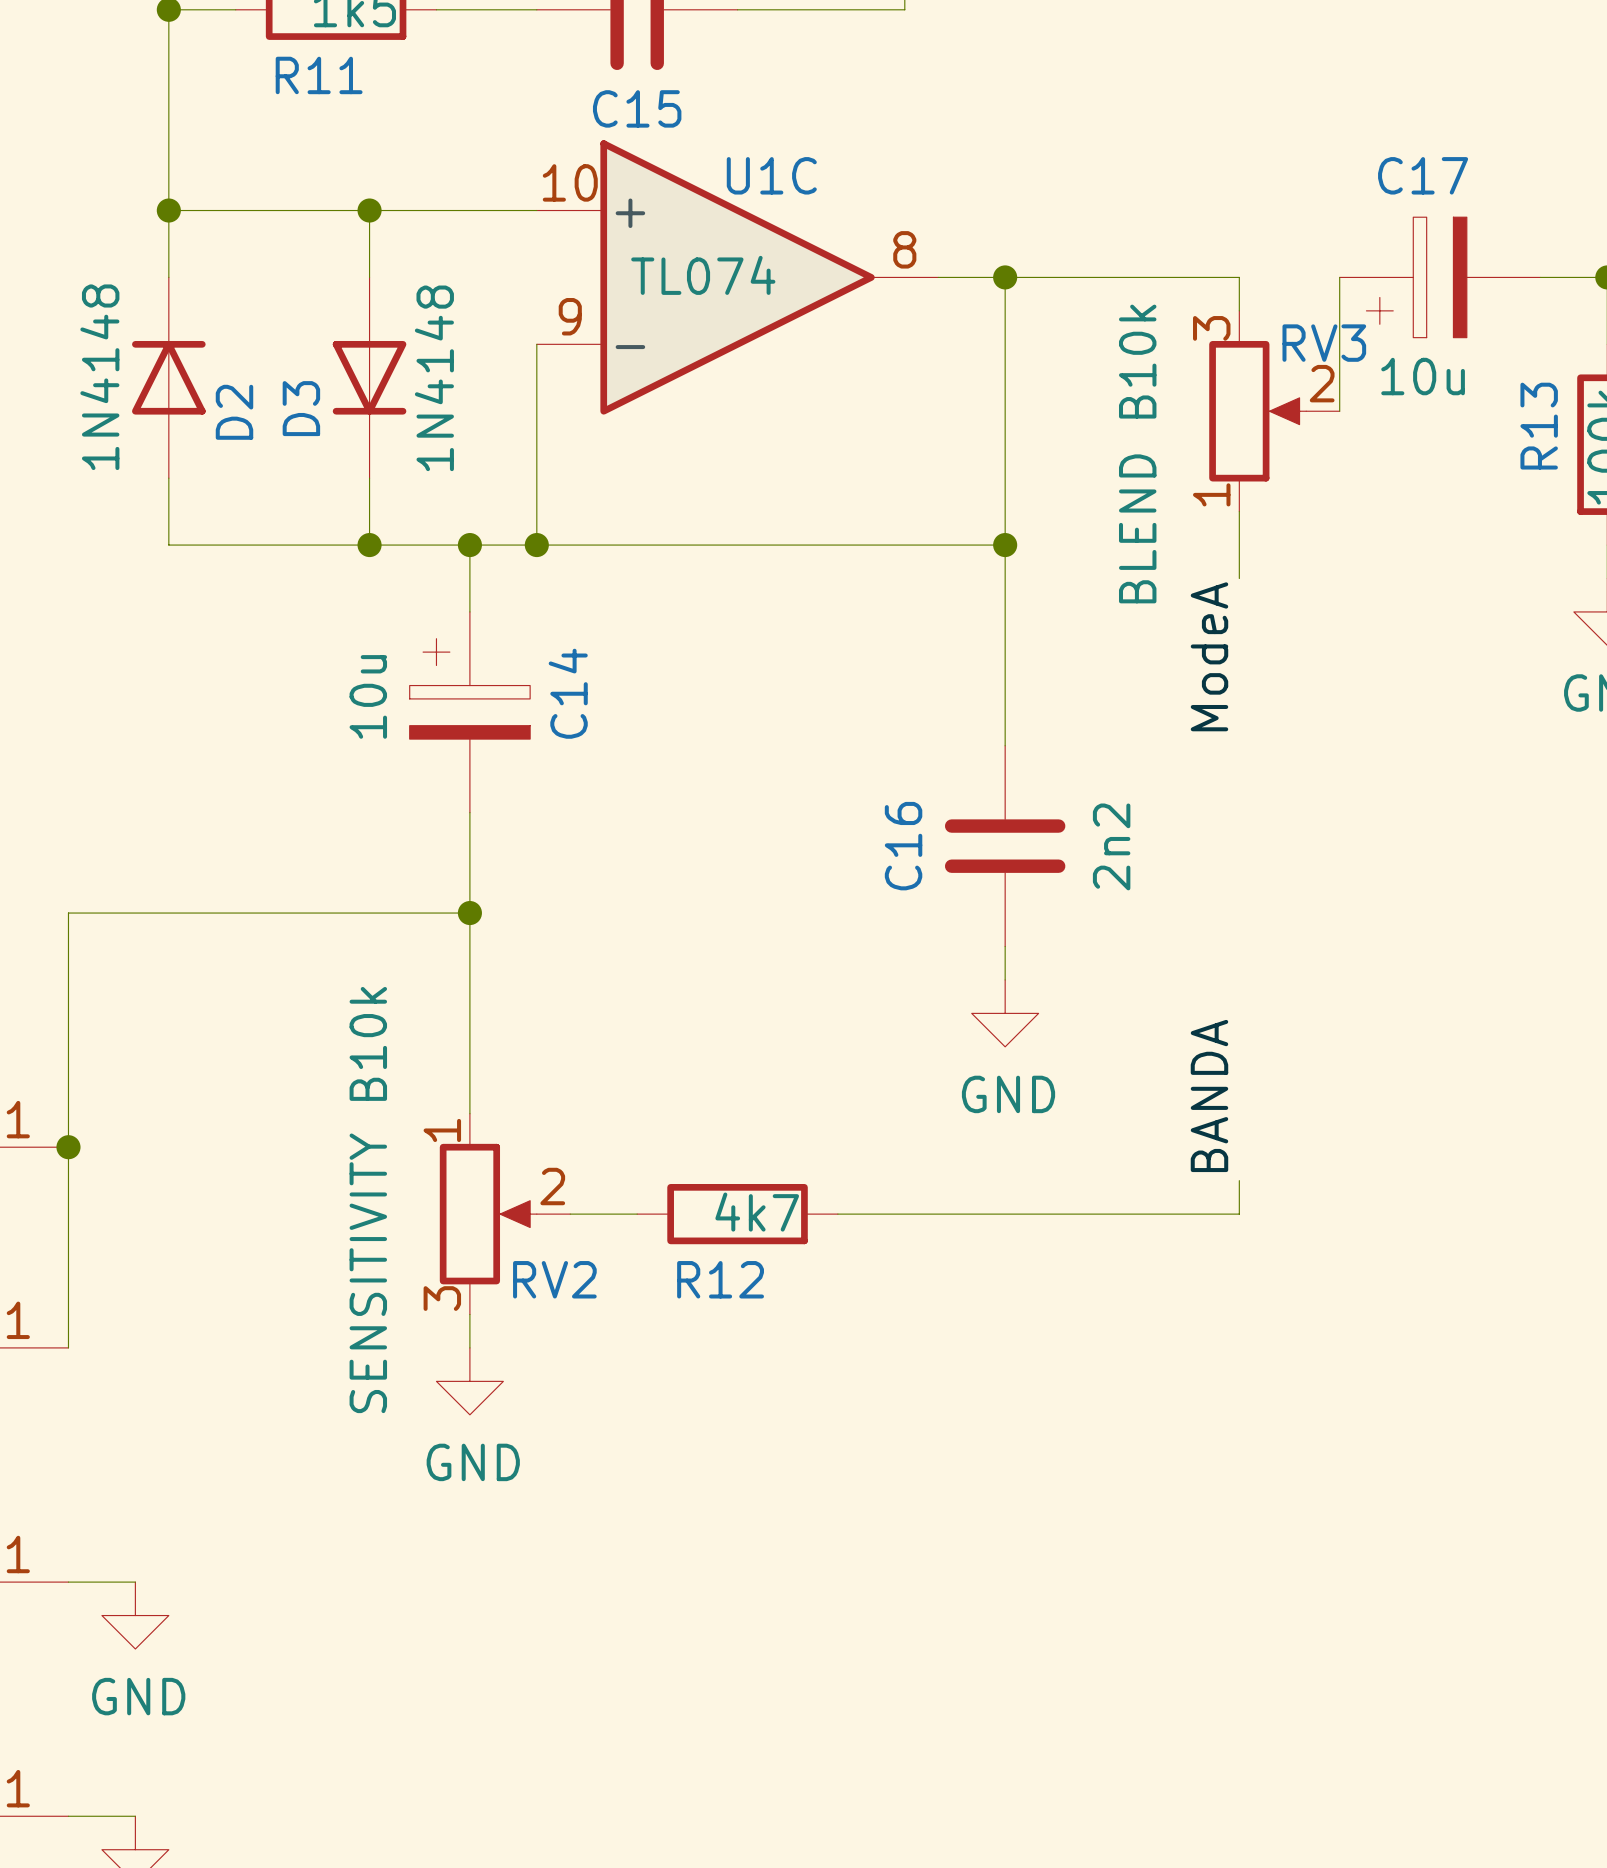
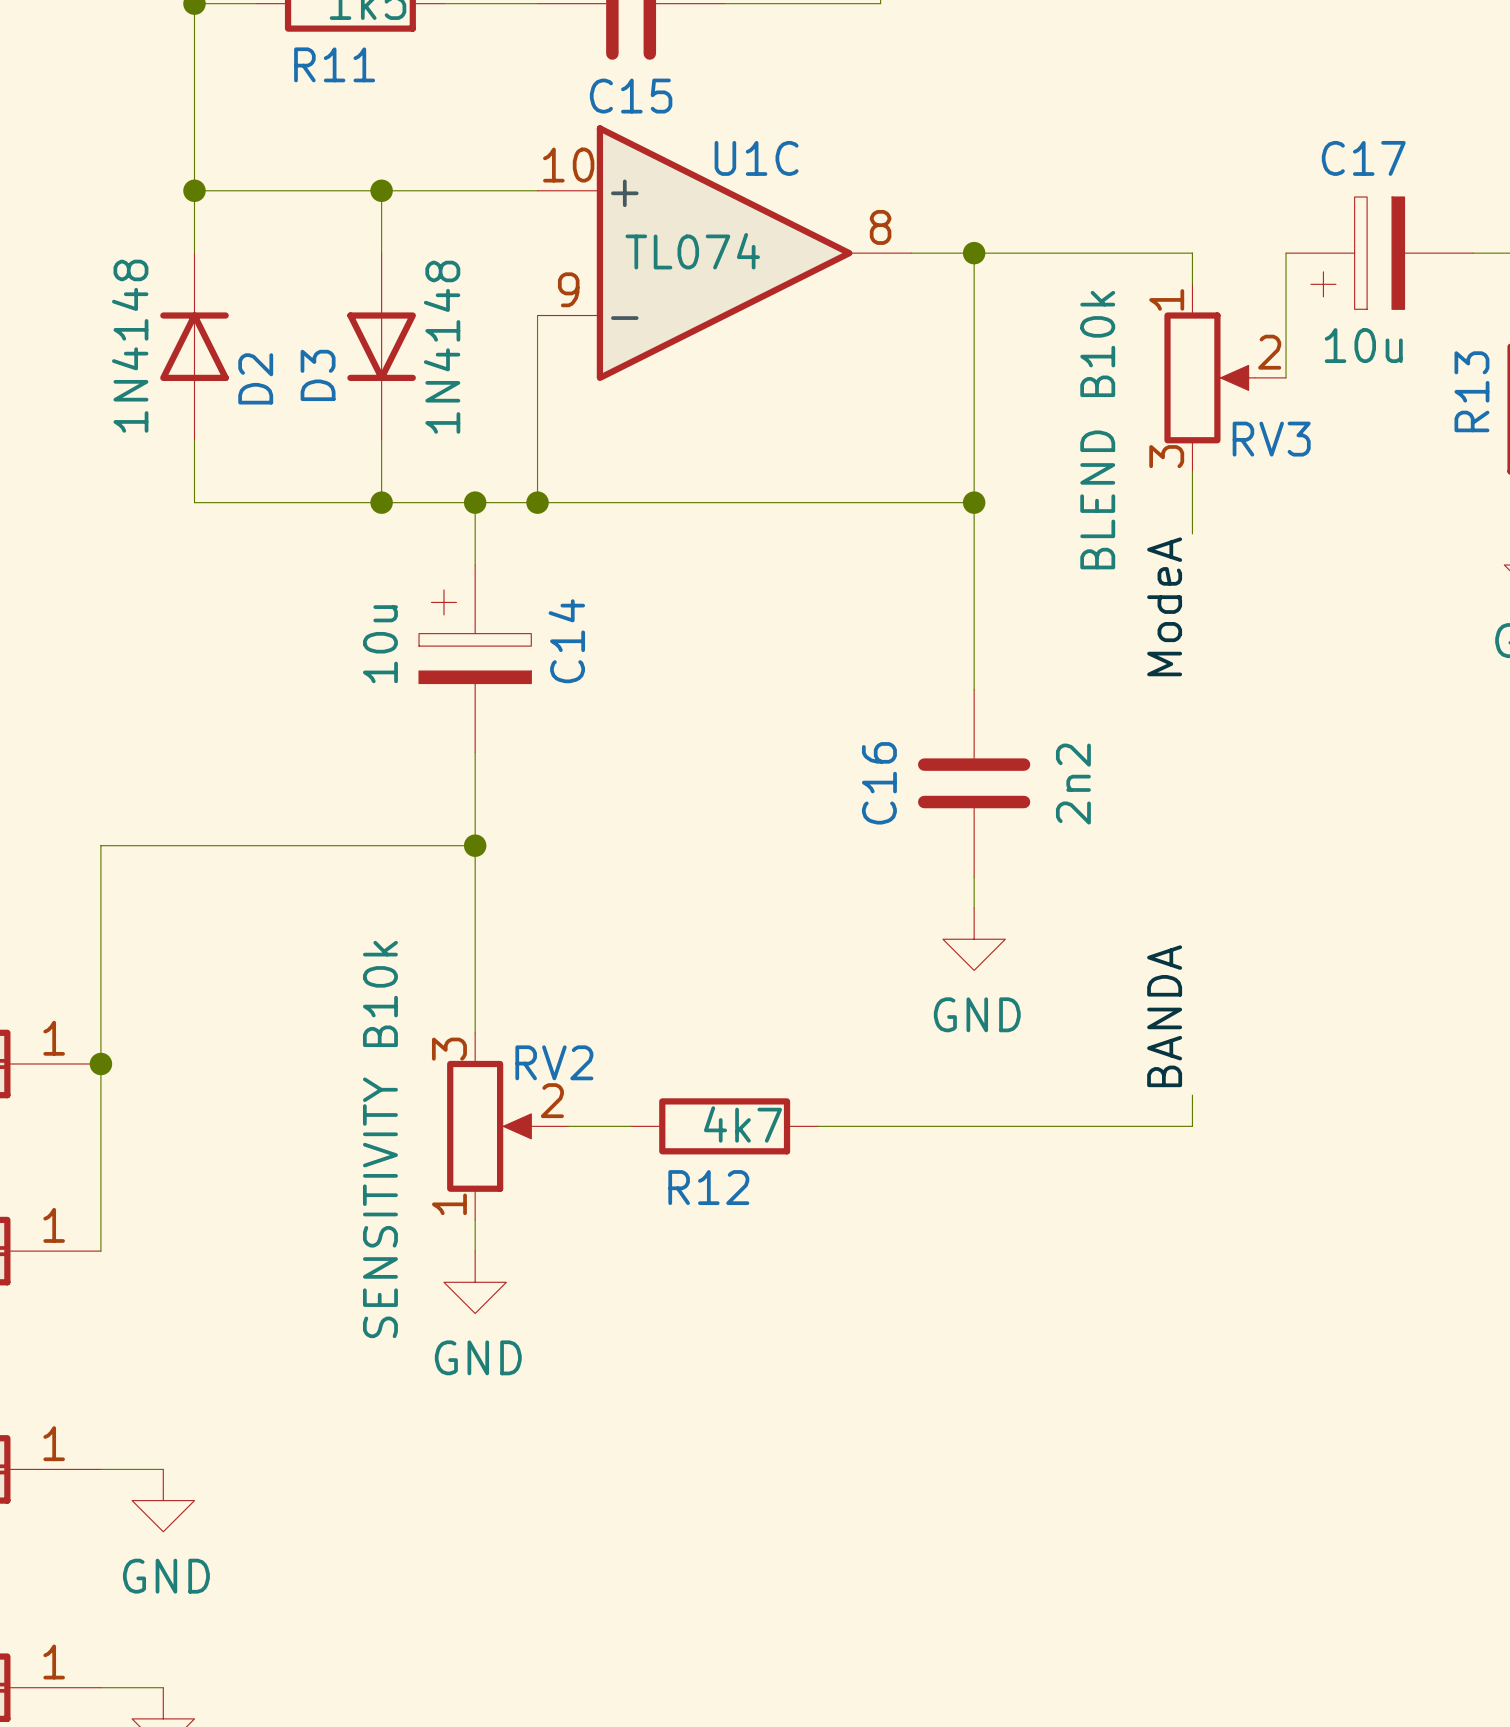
RV3 flip: as is (1257, 411) -> up-down (1209, 377)
RV2 flip: as is (488, 1214) -> up-down (492, 1126)

